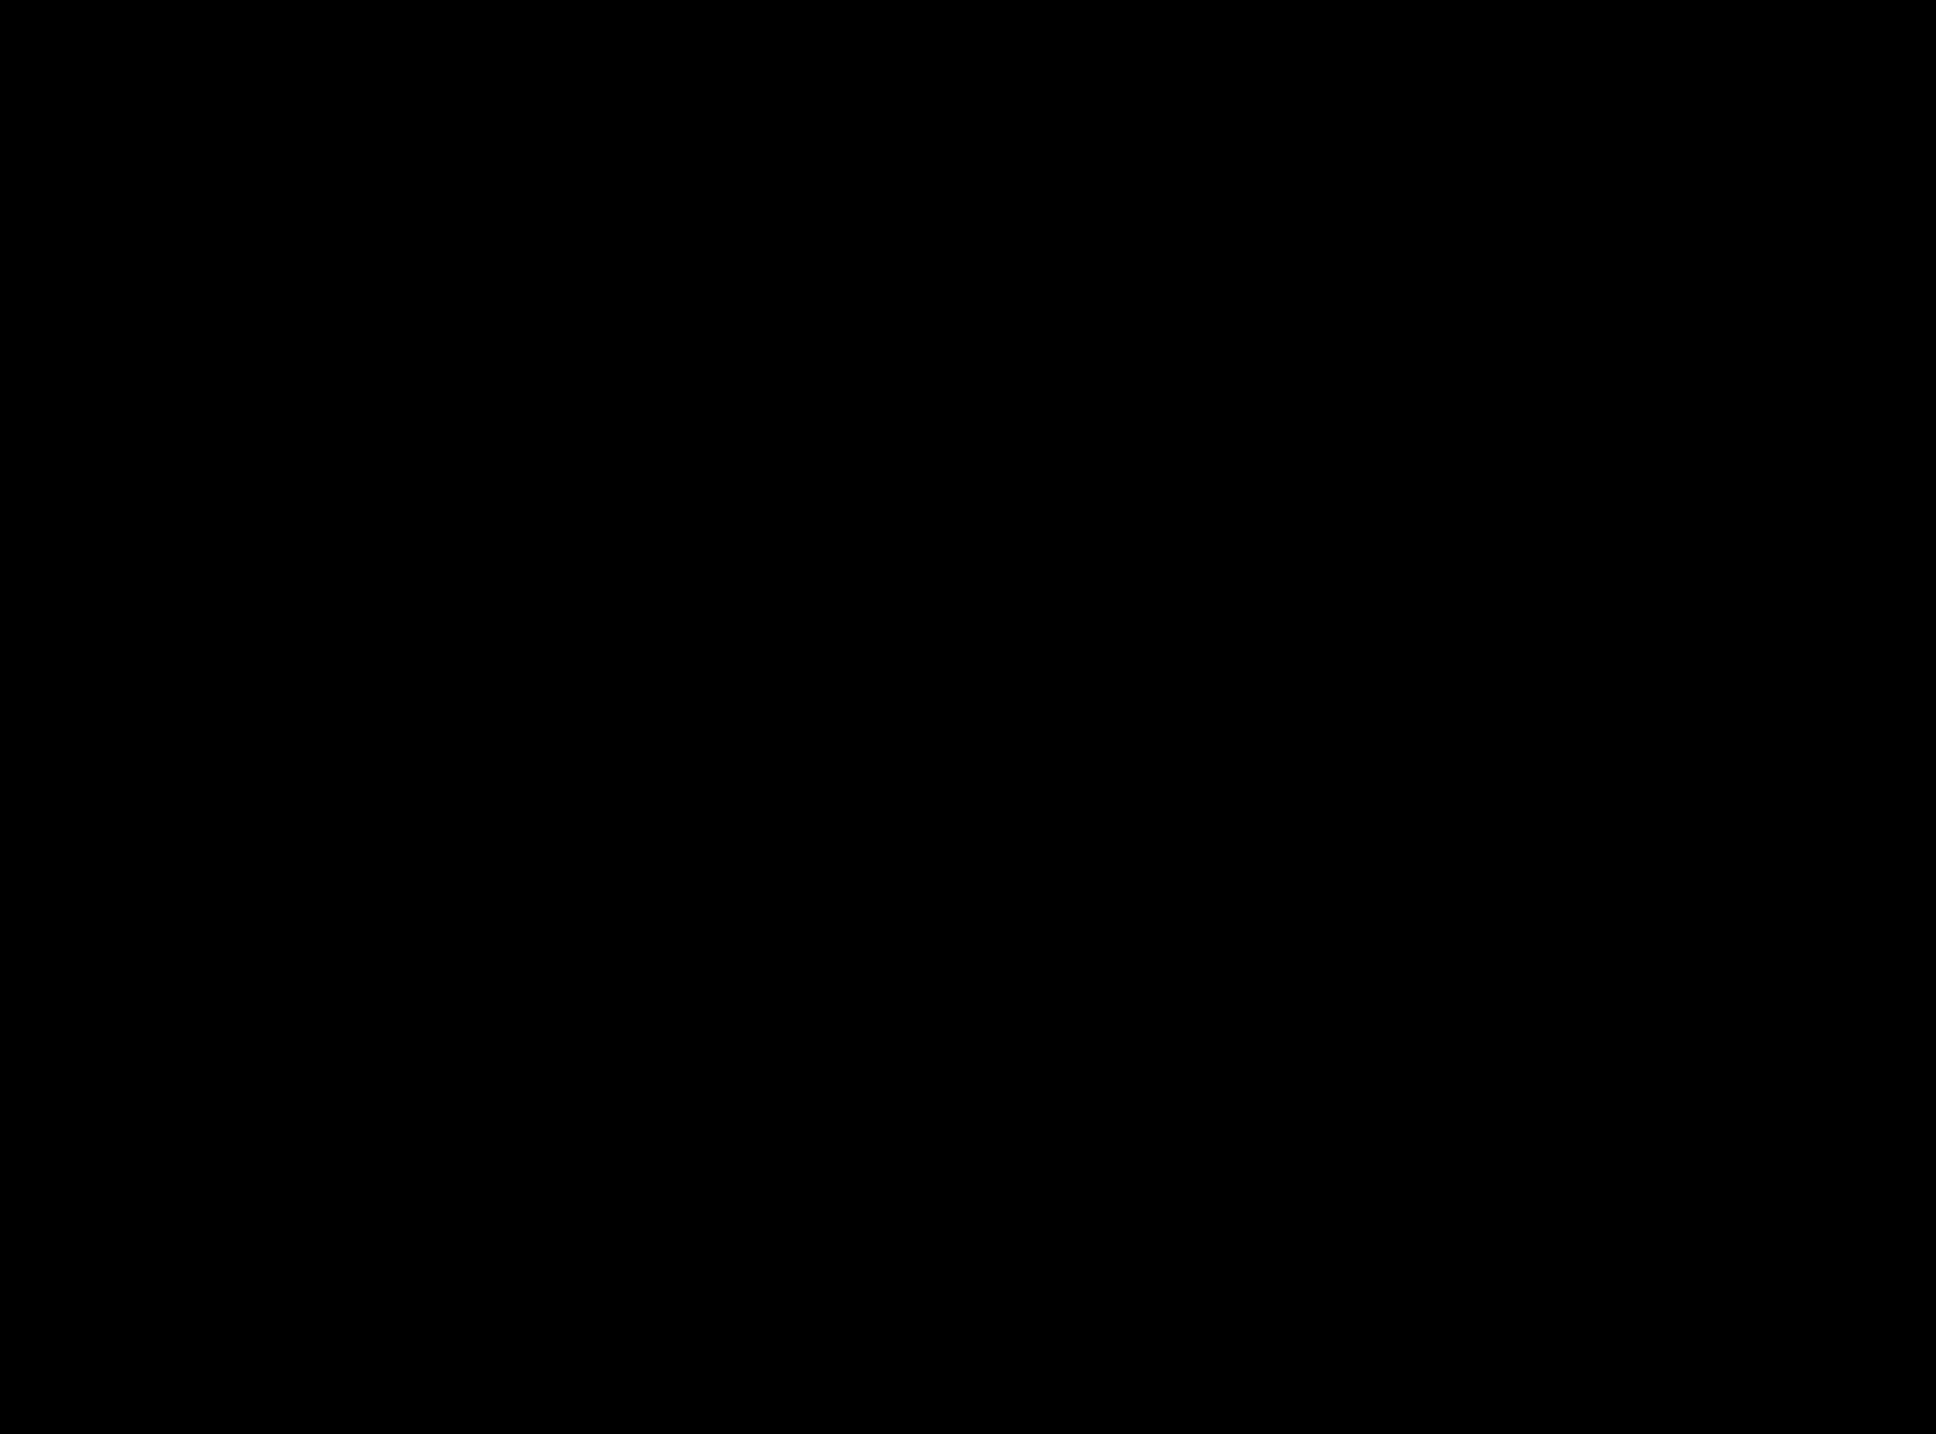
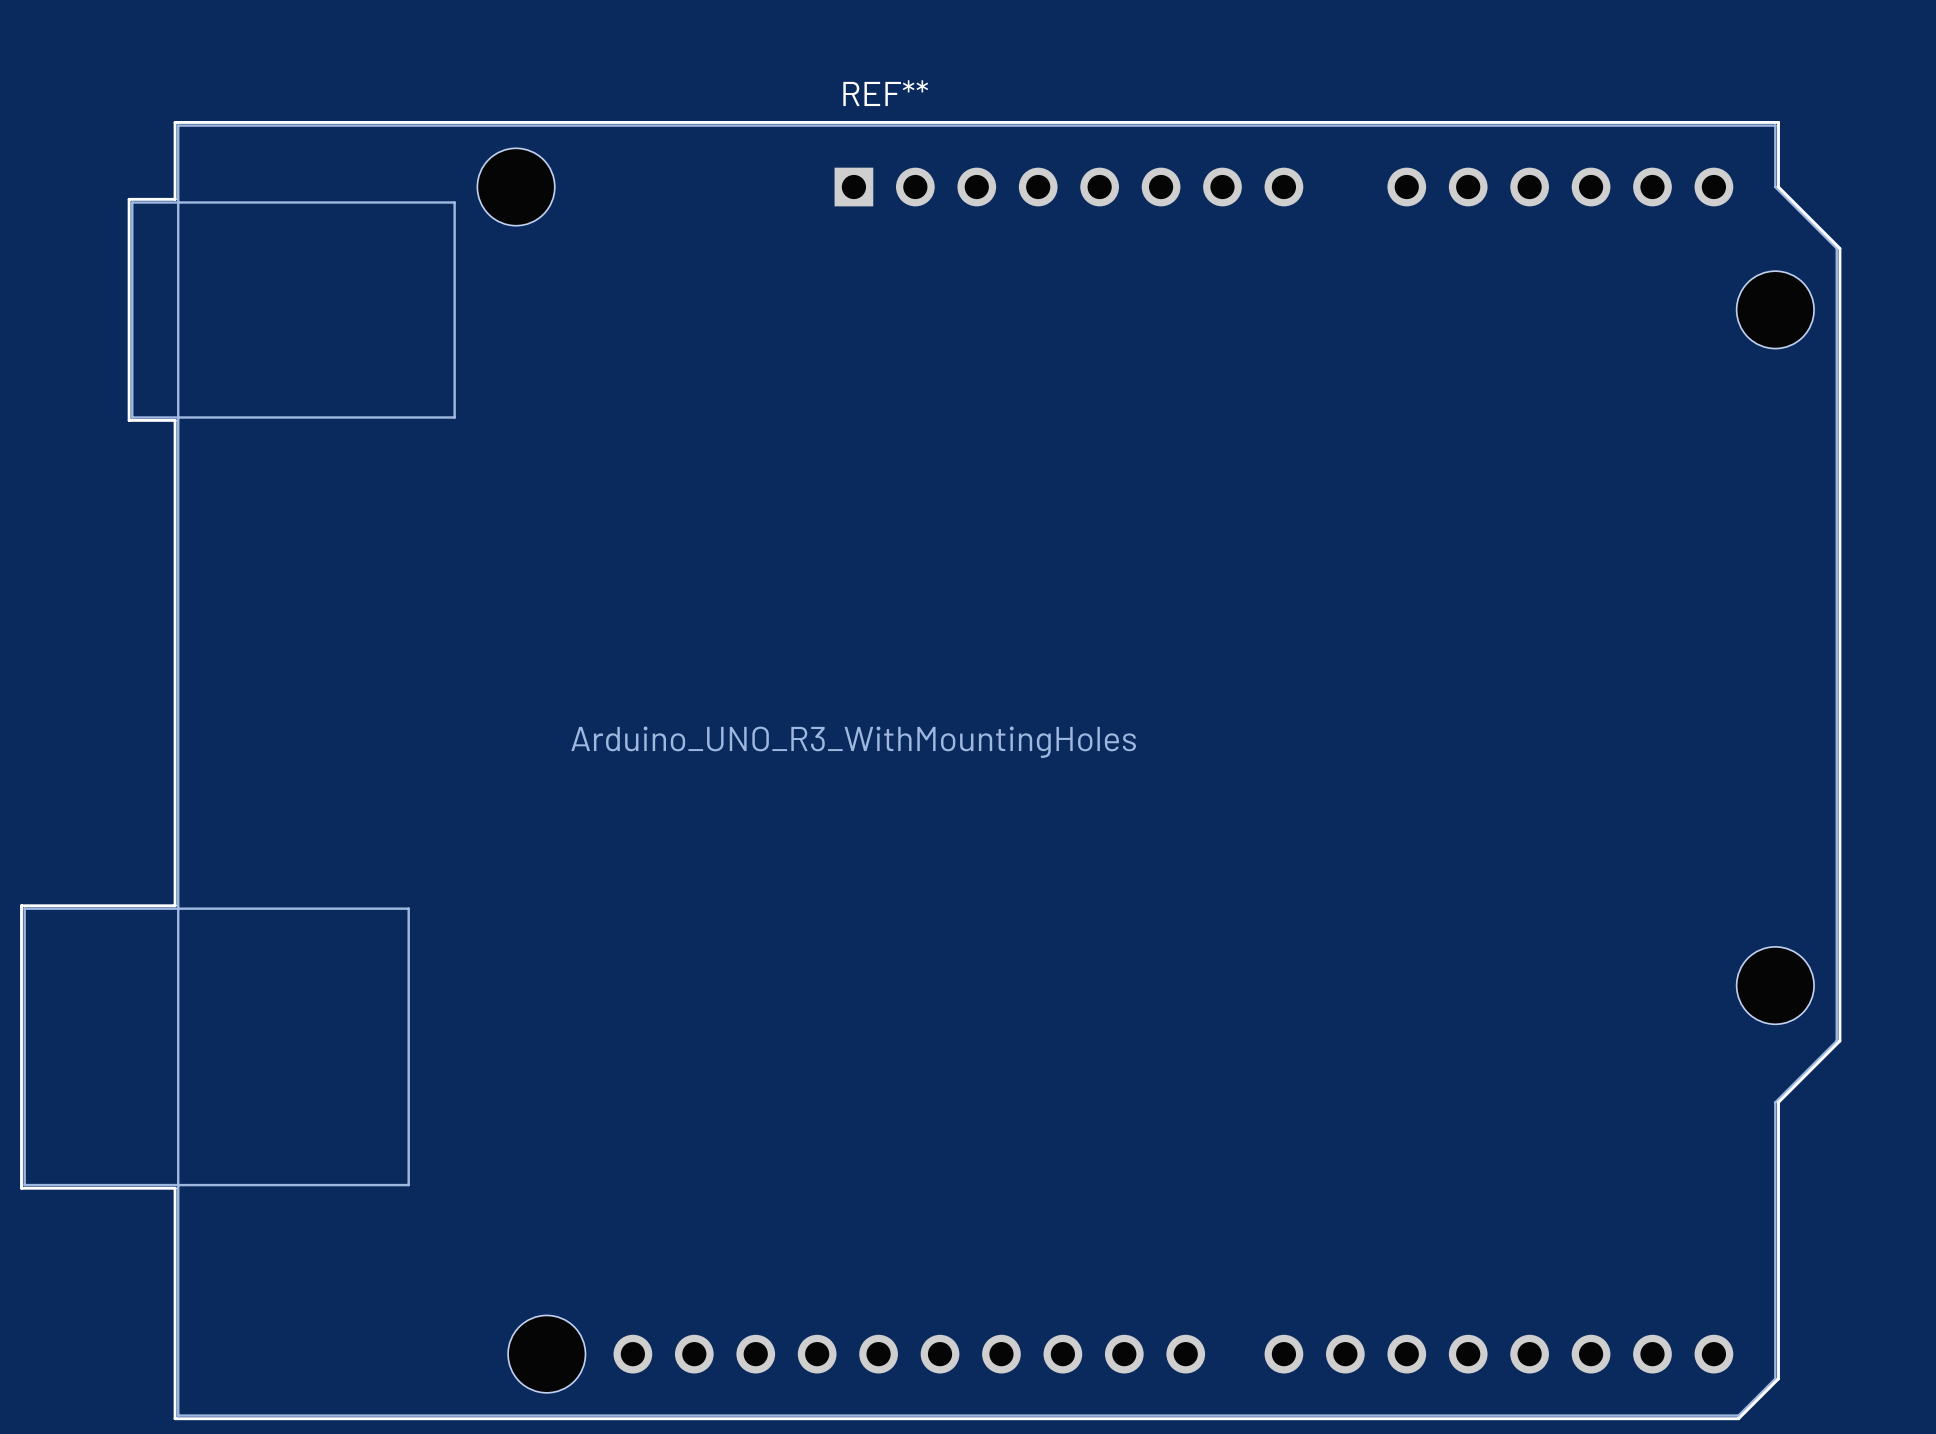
REF**: none -> Arduino_UNO_R3_WithMountingHoles (930, 770)

